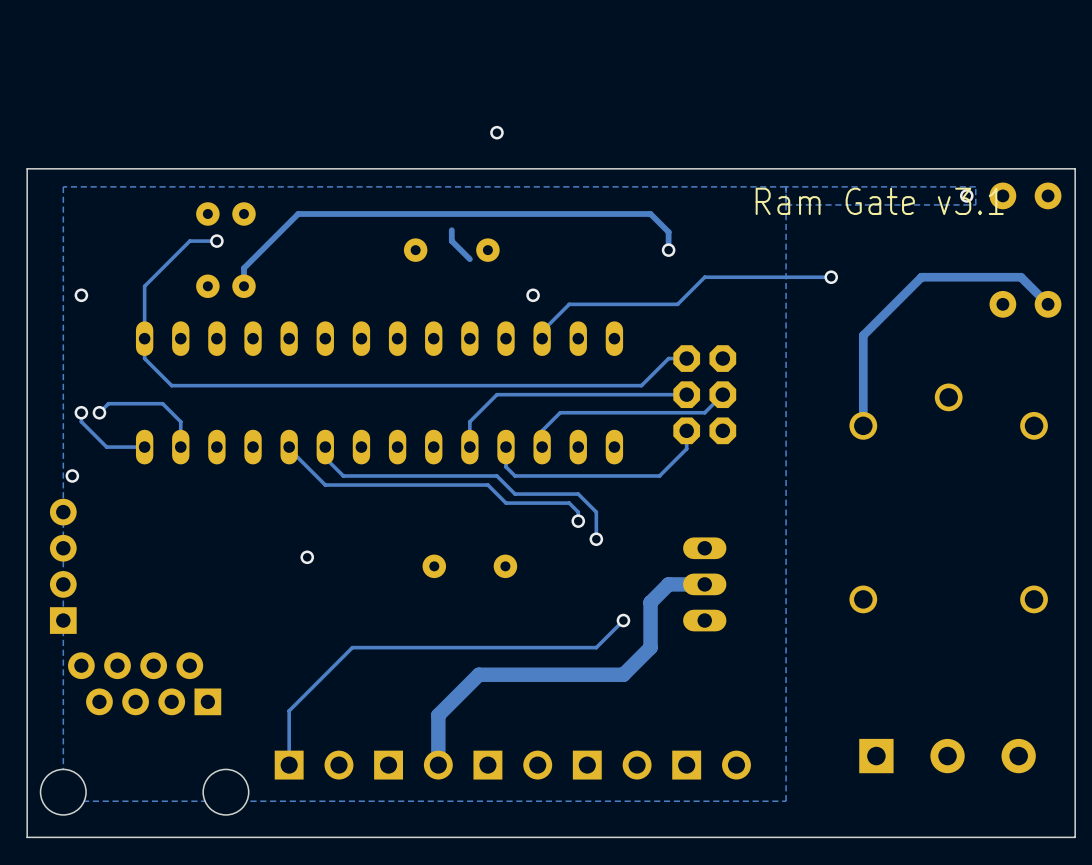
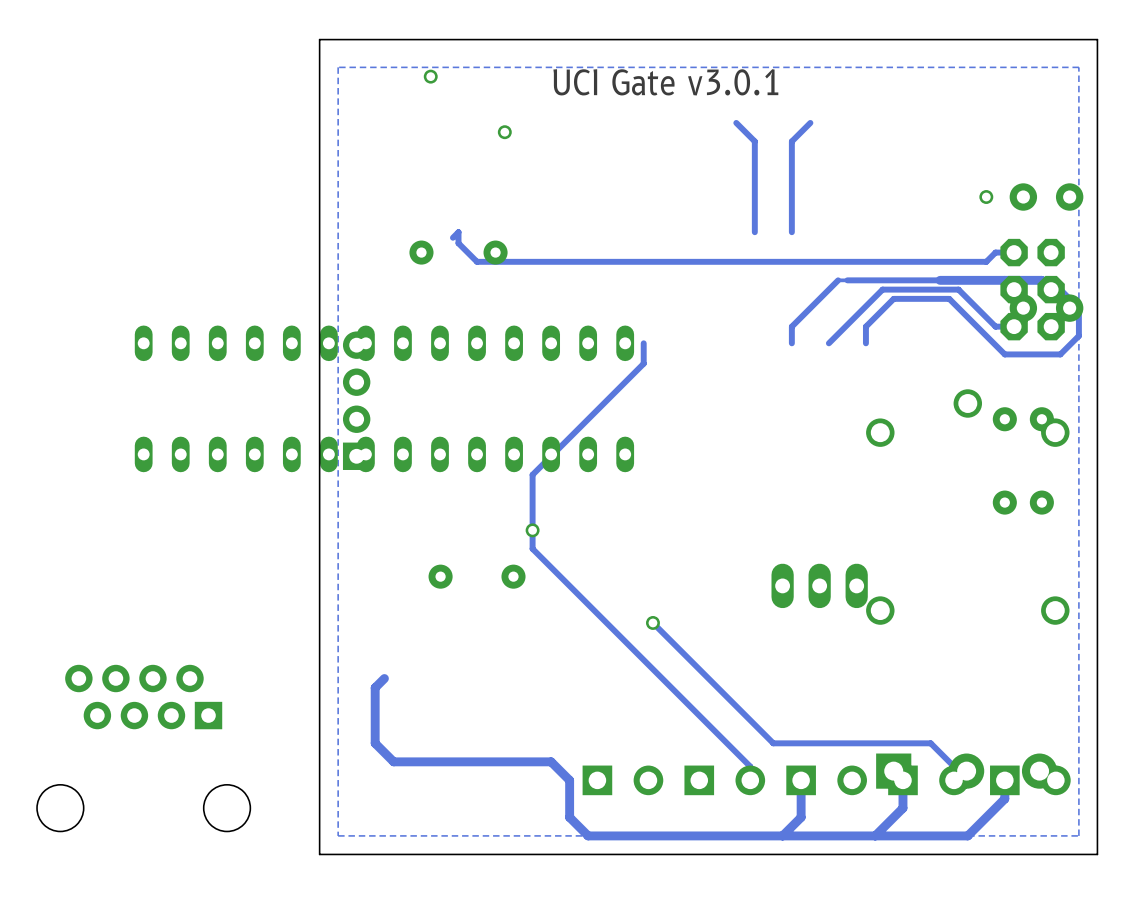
zone outline: none -> (1078, 67) (338, 67) (338, 835) (1078, 835) (1078, 67)
via: none -> (430, 76)
text: none -> UCI Gate v3.0.1 (665, 82)
track: none -> (736, 122) (754, 141) (754, 232)
track: none -> (810, 122) (791, 141) (791, 232)
board edge: (1075, 168) (27, 168) (27, 837) (316, 837) -> (1097, 169) (1097, 39) (319, 39) (319, 854)
zone outline: (786, 186) (786, 801) (63, 801) (63, 186) (975, 186) (975, 204) (786, 204) -> none
text: Ram Gate v3.1 (879, 201) -> none
part: (225, 213) -> none
track: none -> (458, 232) (452, 237)
track: (216, 241) (189, 241) (144, 286) (144, 358) (171, 385) (641, 385) (668, 358) (686, 358) -> none
via: (216, 241) -> none
track: (668, 250) (668, 232) (650, 213) (298, 213) (244, 268) (244, 277) -> none
via: (668, 250) -> none
track: none -> (1014, 252) (995, 252) (986, 261) (477, 261)
track: (822, 277) (704, 277) (677, 304) (569, 304) (542, 331) (542, 338) -> (838, 280) (791, 326) (791, 343)
via: (831, 277) -> none
track: (921, 277) (863, 335) (863, 425) -> (940, 280) (847, 280)
part: (225, 286) -> none
track: none -> (1051, 289) (1060, 289) (1078, 308) (1078, 335) (1060, 354) (1004, 354) (949, 298) (893, 298) (865, 326) (865, 343)
via: (81, 295) -> none
via: (533, 295) -> none
track: none -> (1014, 326) (995, 326) (958, 289) (882, 289) (828, 343)
track: none -> (643, 343) (643, 363) (532, 474) (532, 548) (750, 766) (750, 780)
track: (686, 394) (496, 394) (469, 421) (469, 447) -> none
part position: (704, 394) -> (1032, 289)
track: (722, 394) (704, 412) (560, 412) (542, 430) (542, 447) -> none
track: (81, 412) (81, 421) (106, 447) (144, 447) -> none
via: (81, 412) -> none
track: (99, 412) (108, 403) (162, 403) (180, 421) (180, 447) -> none
via: (99, 412) -> none
part: none -> (1023, 419)
track: (686, 430) (686, 448) (659, 475) (515, 475) (505, 466) (505, 447) -> none
track: (289, 447) (325, 485) (487, 485) (505, 503) (569, 503) (578, 512) (578, 521) -> none
track: (325, 447) (325, 457) (343, 475) (496, 475) (515, 494) (578, 494) (596, 512) (596, 539) -> none
via: (72, 475) -> none
part: none -> (1023, 502)
via: none -> (532, 530)
via: (578, 521) -> none
via: (596, 539) -> none
via: (307, 557) -> none
part position: (63, 566) -> (356, 400)
track: (704, 584) (668, 584) (650, 602) (650, 647) (623, 674) (478, 674) (438, 715) (438, 765) -> none
part rotation: 0° (704, 584) -> 90° clockwise (819, 585)
part position: (704, 584) -> (819, 585)
track: none -> (652, 622) (773, 743) (930, 743) (954, 766) (954, 780)
track: (623, 620) (596, 647) (352, 647) (289, 710) (289, 765) -> none
via position: (623, 620) -> (652, 622)
track: none -> (384, 678) (375, 687) (375, 743) (393, 761) (551, 761) (569, 780) (569, 817) (588, 835) (967, 835) (1004, 798) (1004, 780)
part: (314, 765) -> none
part: (413, 765) -> none
part: (512, 765) -> none
track: none -> (801, 780) (801, 817) (782, 835)
part: none -> (826, 780)
track: none -> (902, 780) (902, 808) (875, 835)
part: none -> (928, 780)
part: none -> (1030, 780)

